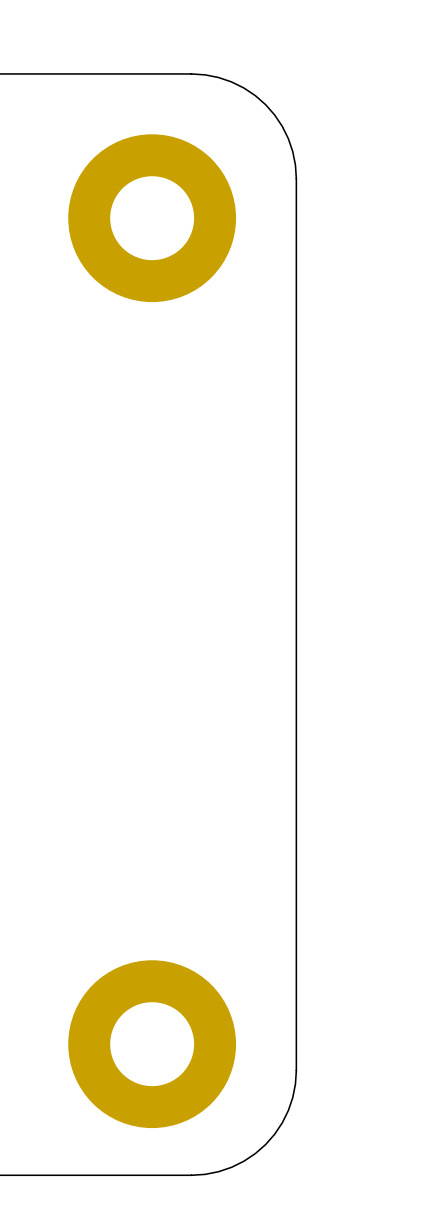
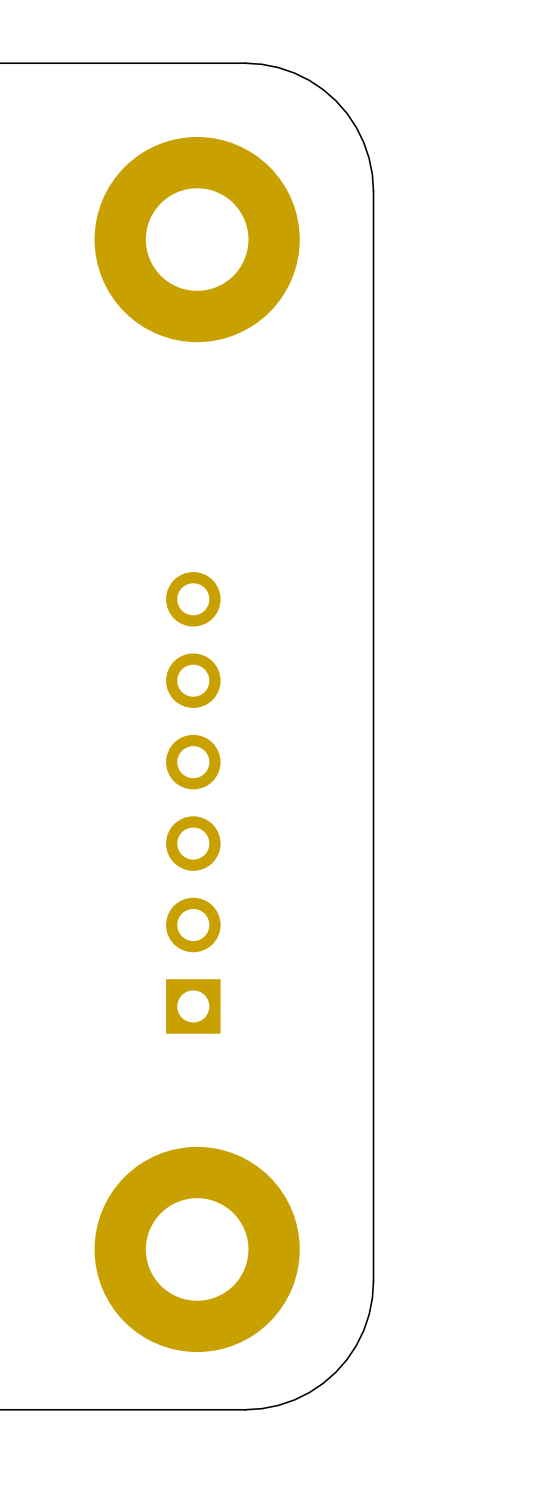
part: none -> (193, 802)

